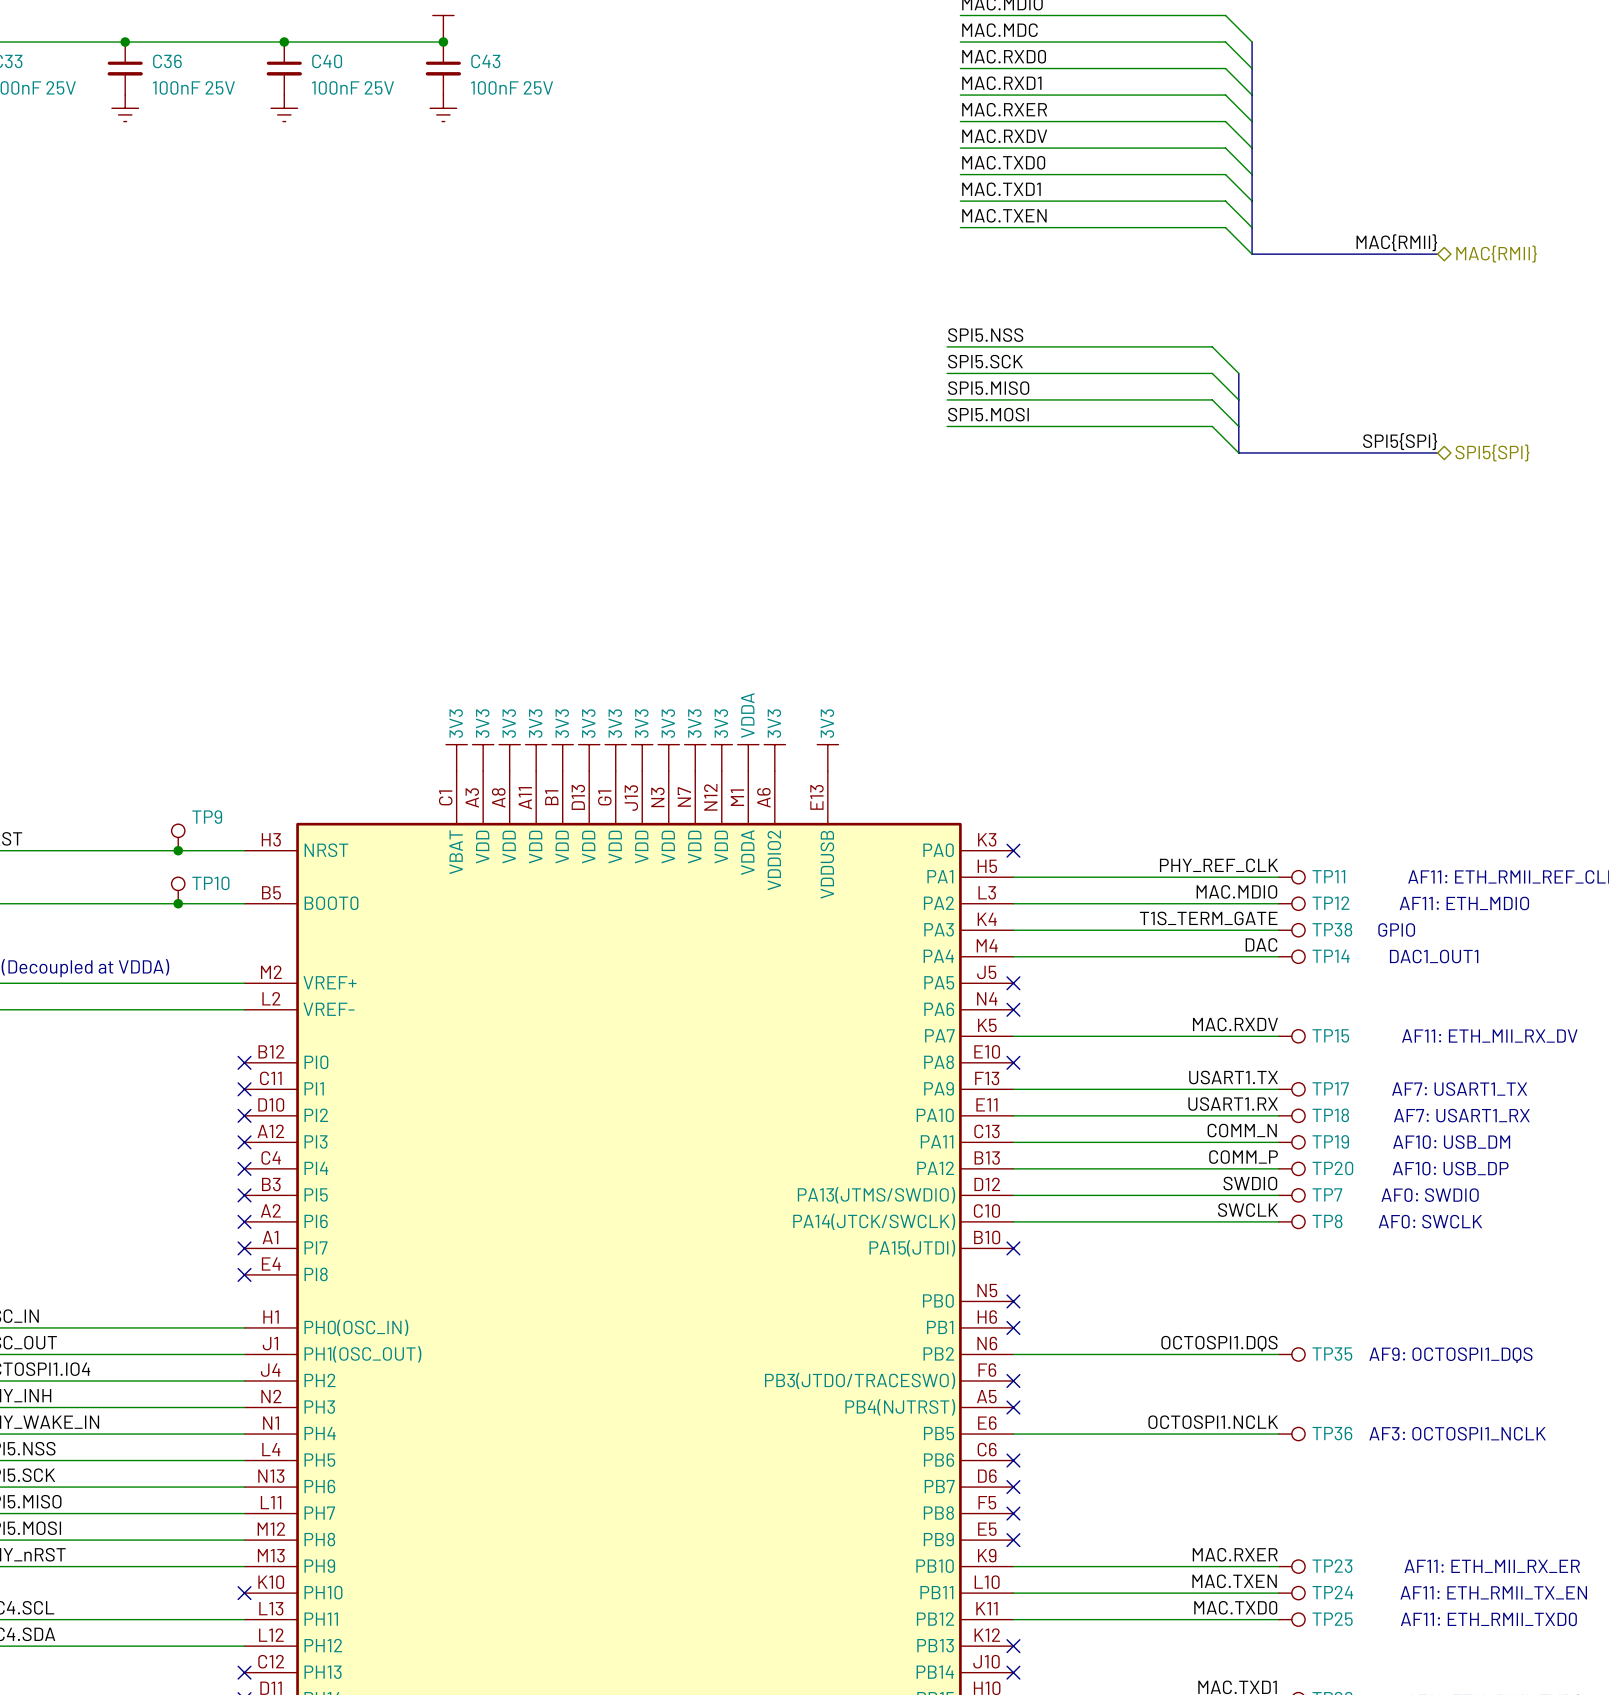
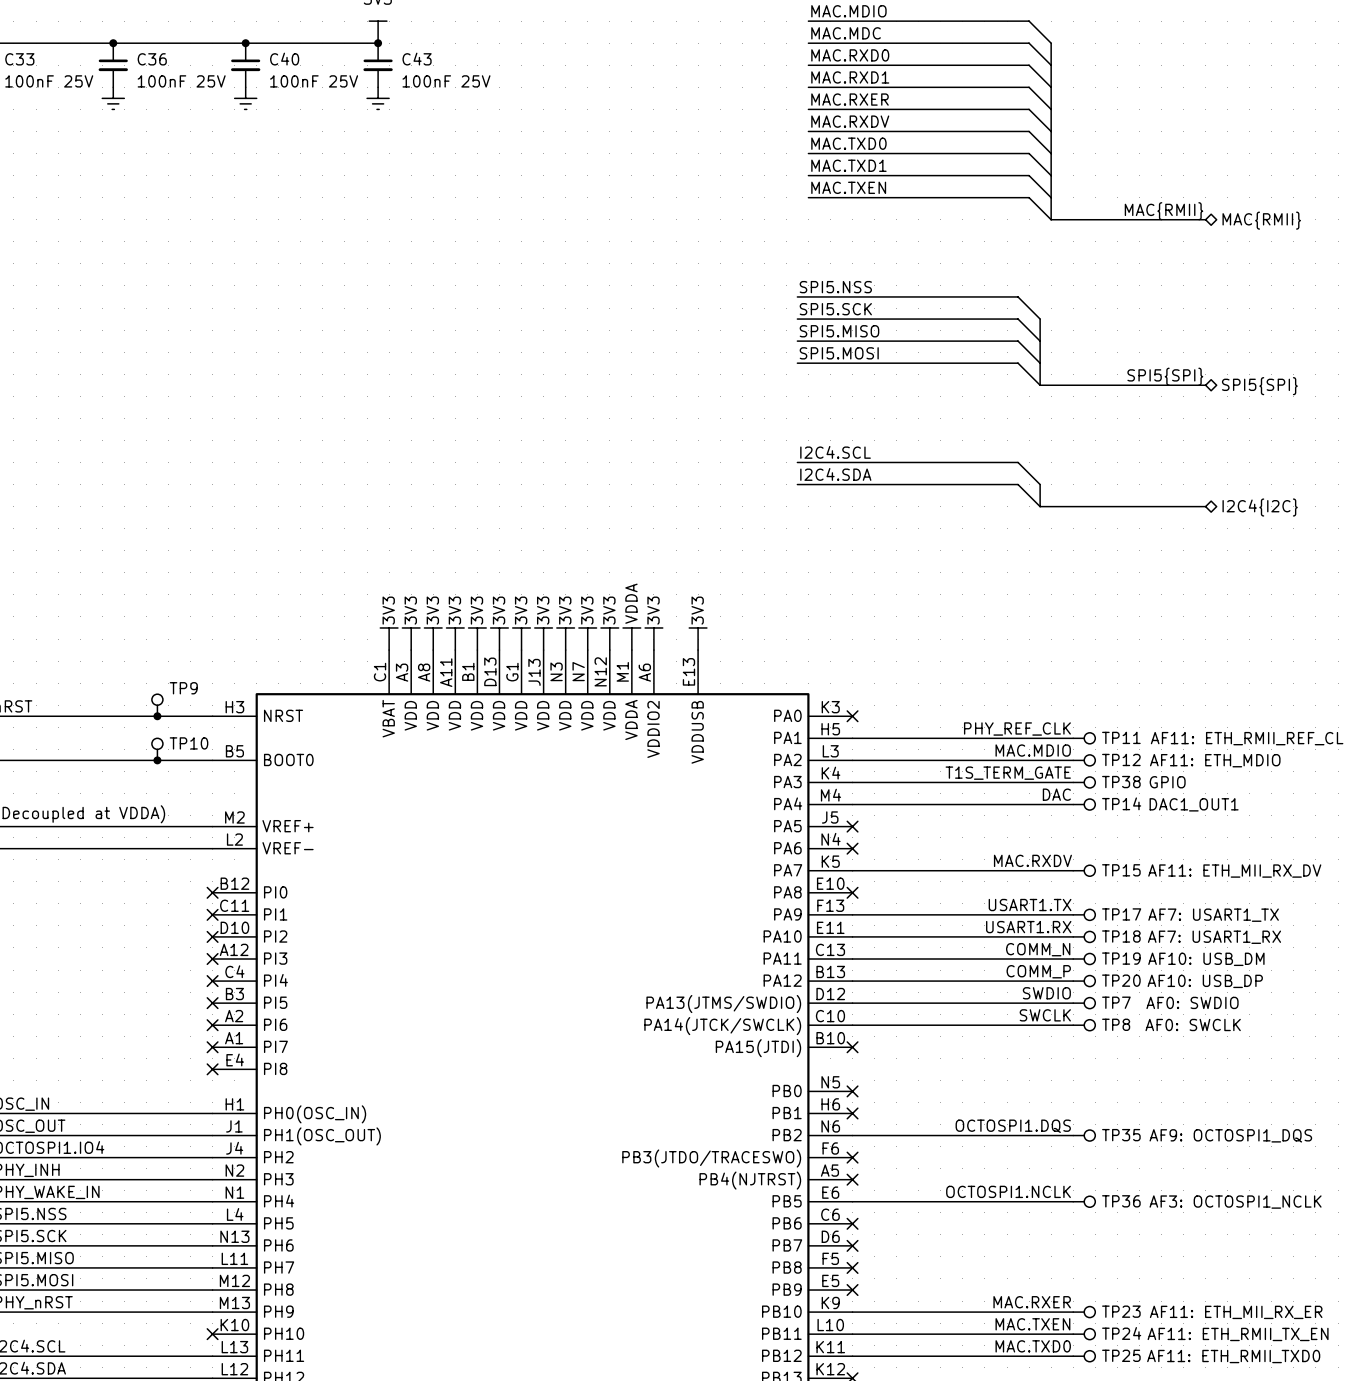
label: none -> I2C4.SCL (835, 452)
wire: none -> (797, 462) (1018, 462) (1040, 484)
label: none -> I2C4.SDA (835, 474)
wire: none -> (797, 484) (1018, 484) (1040, 506)
bus: none -> (1040, 484) (1040, 506) (1205, 506)
hierarchical label: none -> I2C4{I2C} (1260, 507)

